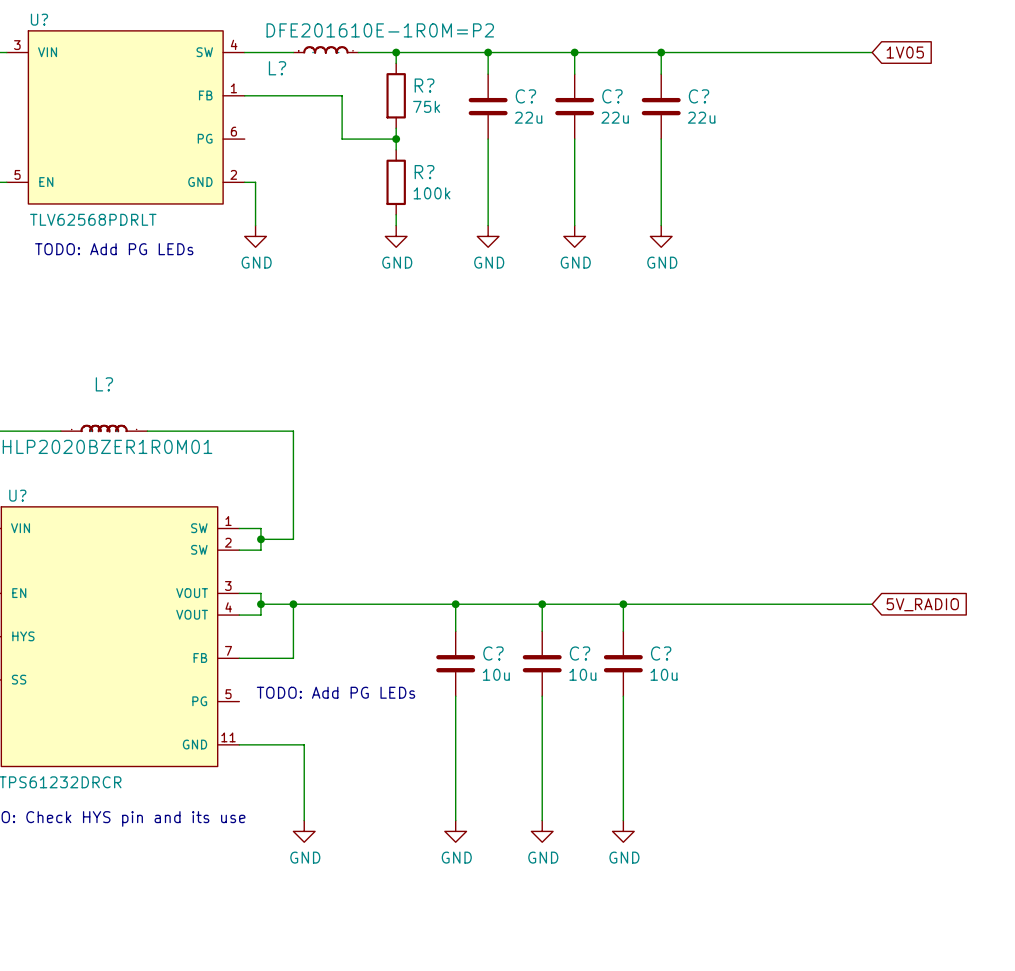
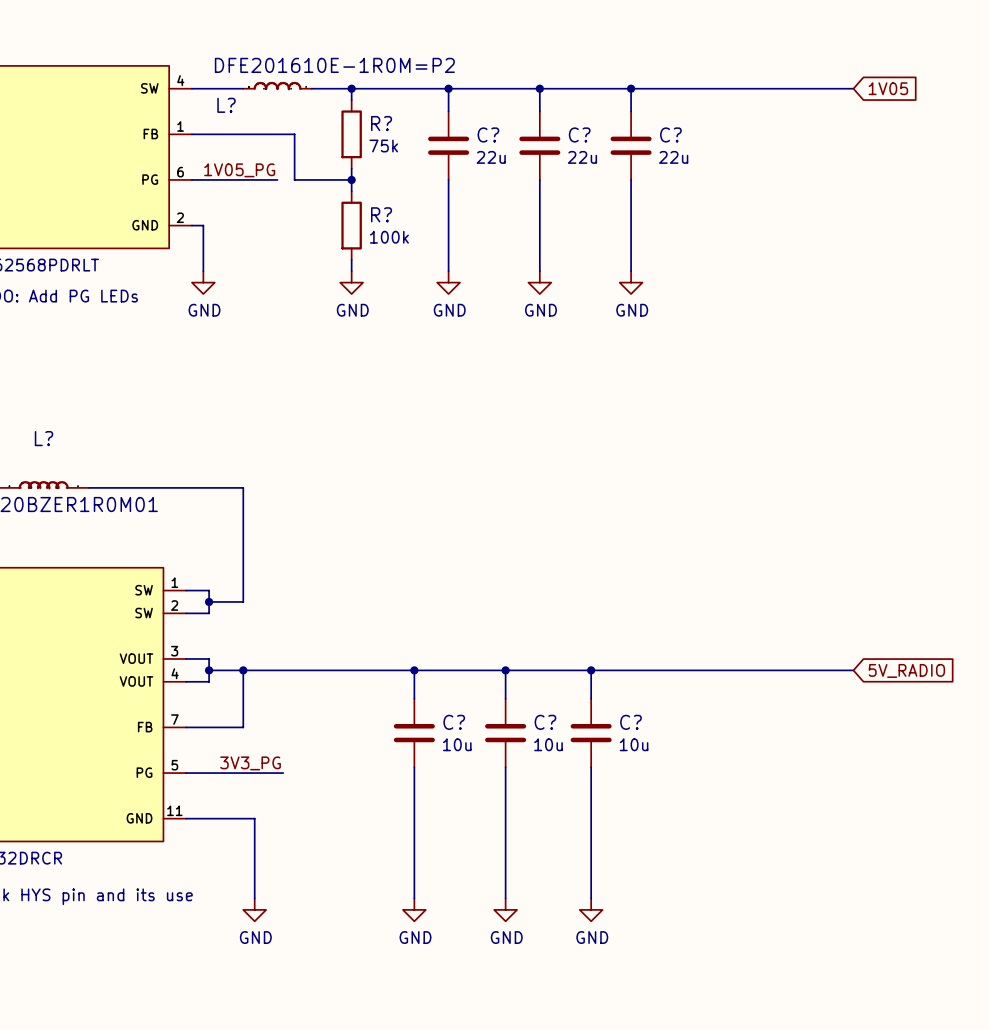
label: none -> 1V05_PG (239, 170)
wire: none -> (191, 179) (277, 179)
label: none -> 3V3_PG (250, 763)
text: TODO: Add PG LEDs (336, 692) -> none
wire: none -> (186, 773) (283, 773)

